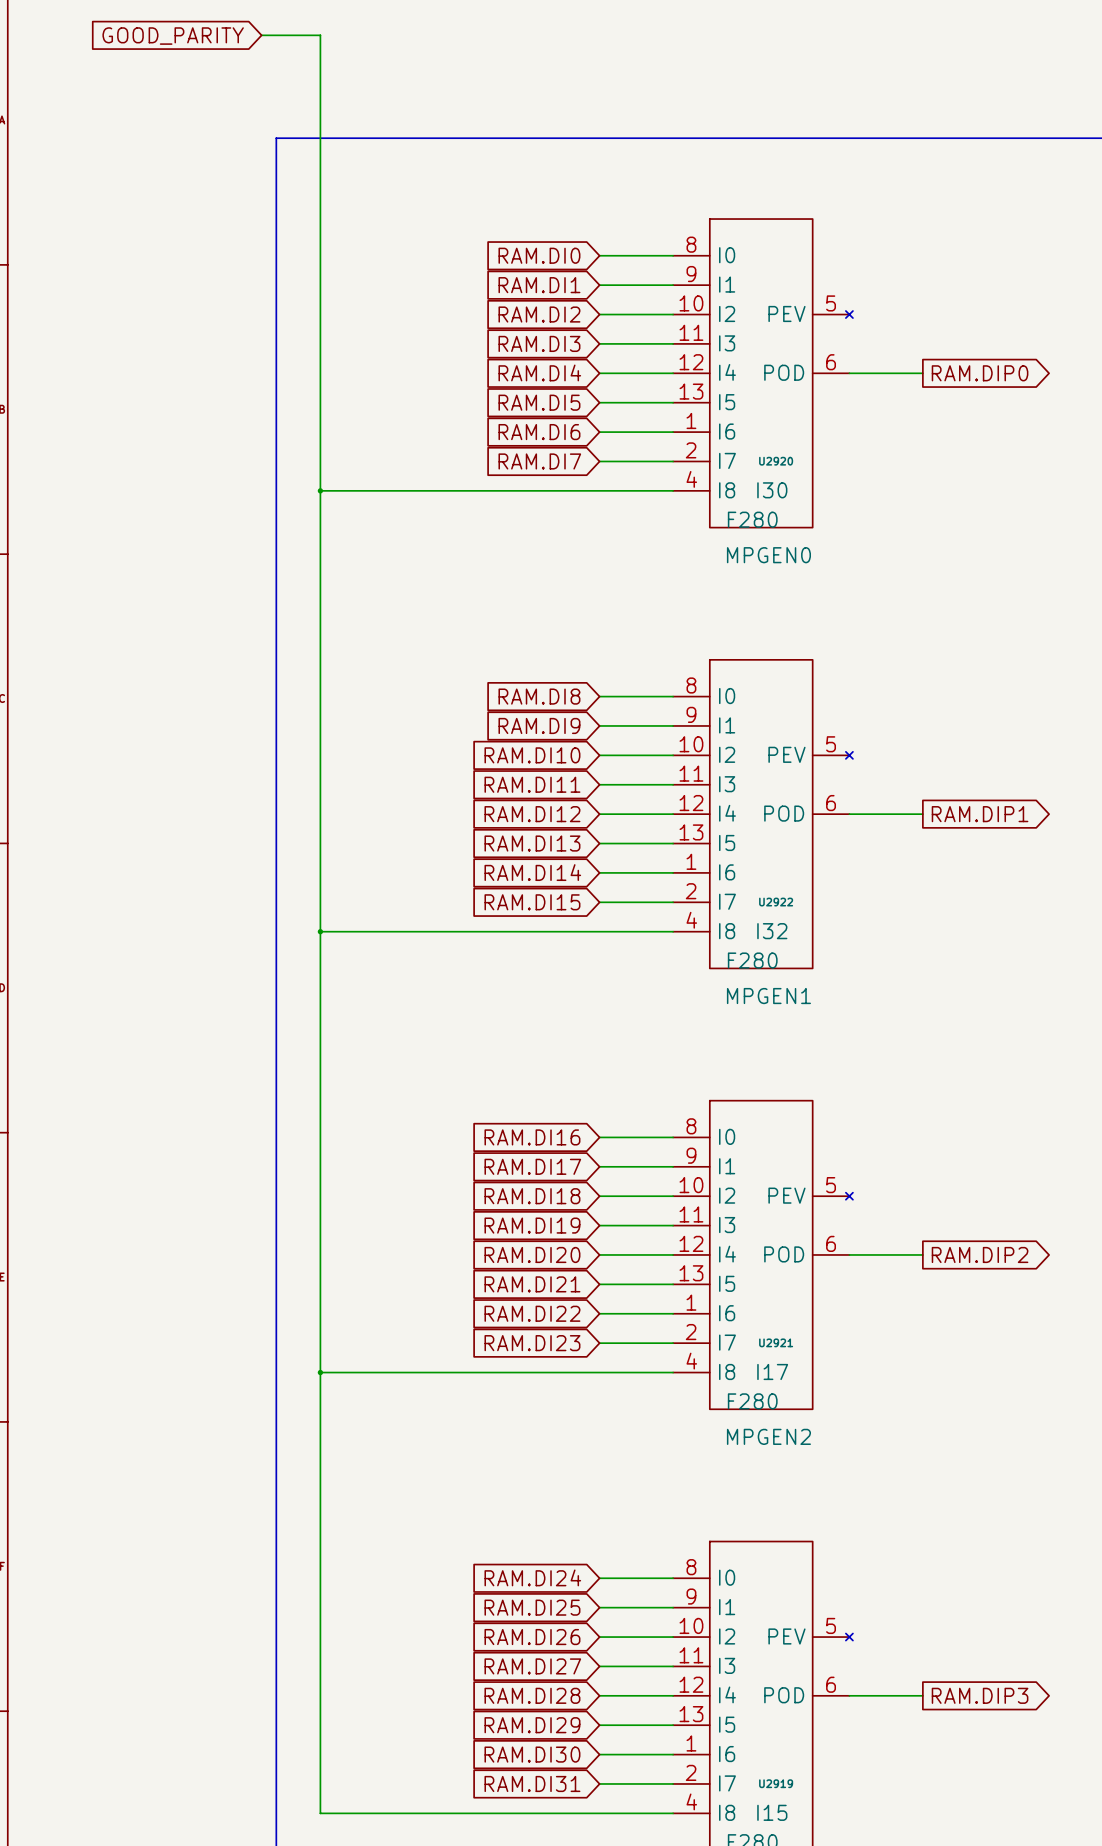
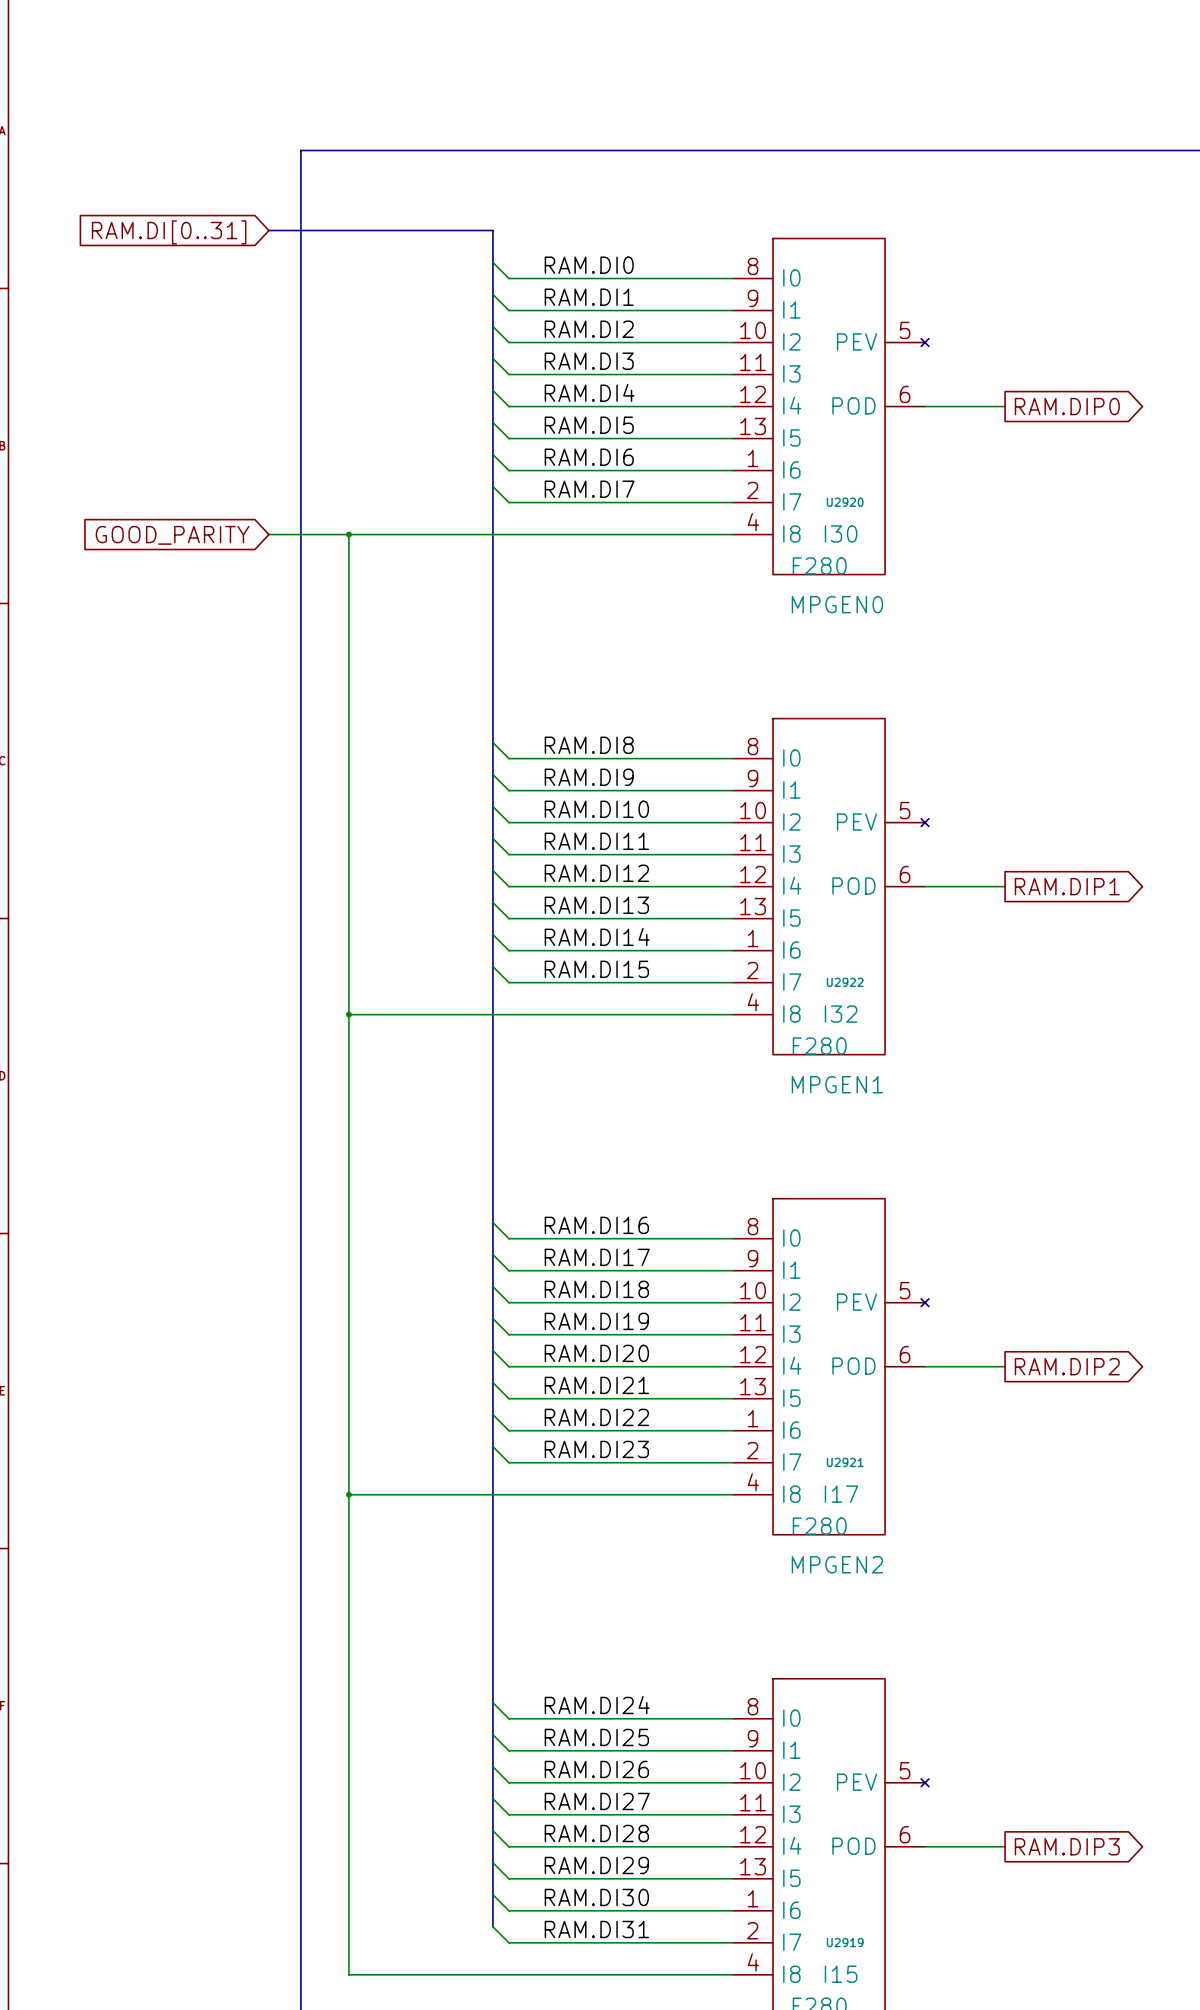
wire: (261, 35) (320, 35) (320, 490) -> (268, 534) (348, 534)
global label: GOOD_PARITY (173, 36) -> none
bus: none -> (268, 230) (492, 230) (492, 1926)
global label: none -> RAM.DI[0..31] (169, 232)
wire: none -> (492, 262) (508, 278) (652, 278)
label: none -> RAM.DI0 (589, 265)
global label: RAM.DI0 (539, 255) -> none
wire: none -> (492, 294) (508, 310) (652, 310)
label: none -> RAM.DI1 (589, 297)
global label: RAM.DI1 (539, 285) -> none
wire: none -> (492, 326) (508, 342) (652, 342)
label: none -> RAM.DI2 (589, 329)
global label: RAM.DI2 (539, 314) -> none
wire: none -> (492, 358) (508, 374) (652, 374)
label: none -> RAM.DI3 (589, 361)
global label: RAM.DI3 (539, 343) -> none
wire: none -> (492, 390) (508, 406) (652, 406)
label: none -> RAM.DI4 (589, 392)
global label: RAM.DI4 (539, 372) -> none
wire: none -> (492, 422) (508, 438) (652, 438)
label: none -> RAM.DI5 (589, 425)
global label: RAM.DI5 (539, 402) -> none
wire: none -> (492, 454) (508, 470) (652, 470)
label: none -> RAM.DI6 (589, 457)
global label: RAM.DI6 (539, 432) -> none
wire: none -> (492, 486) (508, 502) (652, 502)
label: none -> RAM.DI7 (589, 489)
global label: RAM.DI7 (539, 461) -> none
global label: none -> GOOD_PARITY (172, 535)
wire: none -> (492, 742) (508, 758) (652, 758)
label: none -> RAM.DI8 (589, 745)
global label: RAM.DI8 (539, 696) -> none
wire: none -> (492, 774) (508, 790) (652, 790)
label: none -> RAM.DI9 (589, 777)
global label: RAM.DI9 (539, 725) -> none
wire: none -> (492, 806) (508, 822) (652, 822)
label: none -> RAM.DI10 (596, 809)
global label: RAM.DI10 (532, 755) -> none
wire: none -> (492, 838) (508, 854) (652, 854)
label: none -> RAM.DI11 (596, 841)
global label: RAM.DI11 (532, 784) -> none
wire: none -> (492, 870) (508, 886) (652, 886)
label: none -> RAM.DI12 (596, 873)
global label: RAM.DI12 (532, 814) -> none
wire: none -> (492, 902) (508, 918) (652, 918)
label: none -> RAM.DI13 (596, 905)
global label: RAM.DI13 (532, 843) -> none
wire: none -> (492, 934) (508, 950) (652, 950)
label: none -> RAM.DI14 (597, 936)
global label: RAM.DI14 (532, 872) -> none
wire: none -> (492, 966) (508, 982) (652, 982)
label: none -> RAM.DI15 (596, 969)
global label: RAM.DI15 (532, 902) -> none
wire: none -> (492, 1222) (508, 1238) (652, 1238)
label: none -> RAM.DI16 (596, 1225)
global label: RAM.DI16 (532, 1137) -> none
wire: none -> (492, 1254) (508, 1270) (652, 1270)
label: none -> RAM.DI17 (597, 1257)
global label: RAM.DI17 (532, 1166) -> none
wire: none -> (492, 1286) (508, 1302) (652, 1302)
label: none -> RAM.DI18 (596, 1289)
global label: RAM.DI18 (532, 1196) -> none
wire: none -> (492, 1318) (508, 1334) (652, 1334)
label: none -> RAM.DI19 (596, 1321)
global label: RAM.DI19 (532, 1225) -> none
wire: none -> (492, 1350) (508, 1366) (652, 1366)
label: none -> RAM.DI20 (596, 1353)
global label: RAM.DI20 (532, 1254) -> none
wire: none -> (492, 1382) (508, 1398) (652, 1398)
label: none -> RAM.DI21 (596, 1385)
global label: RAM.DI21 (532, 1284) -> none
wire: none -> (492, 1414) (508, 1430) (652, 1430)
label: none -> RAM.DI22 (596, 1417)
global label: RAM.DI22 (532, 1313) -> none
wire: none -> (492, 1446) (508, 1462) (652, 1462)
label: none -> RAM.DI23 (596, 1449)
global label: RAM.DI23 (532, 1343) -> none
wire: none -> (492, 1702) (508, 1718) (652, 1718)
label: none -> RAM.DI24 (597, 1705)
global label: RAM.DI24 (532, 1577) -> none
wire: none -> (492, 1734) (508, 1750) (652, 1750)
label: none -> RAM.DI25 (596, 1737)
global label: RAM.DI25 (532, 1607) -> none
wire: none -> (492, 1766) (508, 1782) (652, 1782)
label: none -> RAM.DI26 (596, 1769)
global label: RAM.DI26 (532, 1637) -> none
wire: none -> (492, 1798) (508, 1814) (652, 1814)
label: none -> RAM.DI27 (597, 1801)
global label: RAM.DI27 (532, 1666) -> none
wire: none -> (492, 1830) (508, 1846) (652, 1846)
label: none -> RAM.DI28 (596, 1833)
global label: RAM.DI28 (532, 1695) -> none
wire: none -> (492, 1862) (508, 1878) (652, 1878)
label: none -> RAM.DI29 (596, 1865)
global label: RAM.DI29 (532, 1725) -> none
wire: none -> (492, 1894) (508, 1910) (652, 1910)
label: none -> RAM.DI30 (596, 1897)
global label: RAM.DI30 (532, 1754) -> none
wire: none -> (492, 1926) (508, 1942) (652, 1942)
label: none -> RAM.DI31 (596, 1929)
global label: RAM.DI31 (532, 1783) -> none

